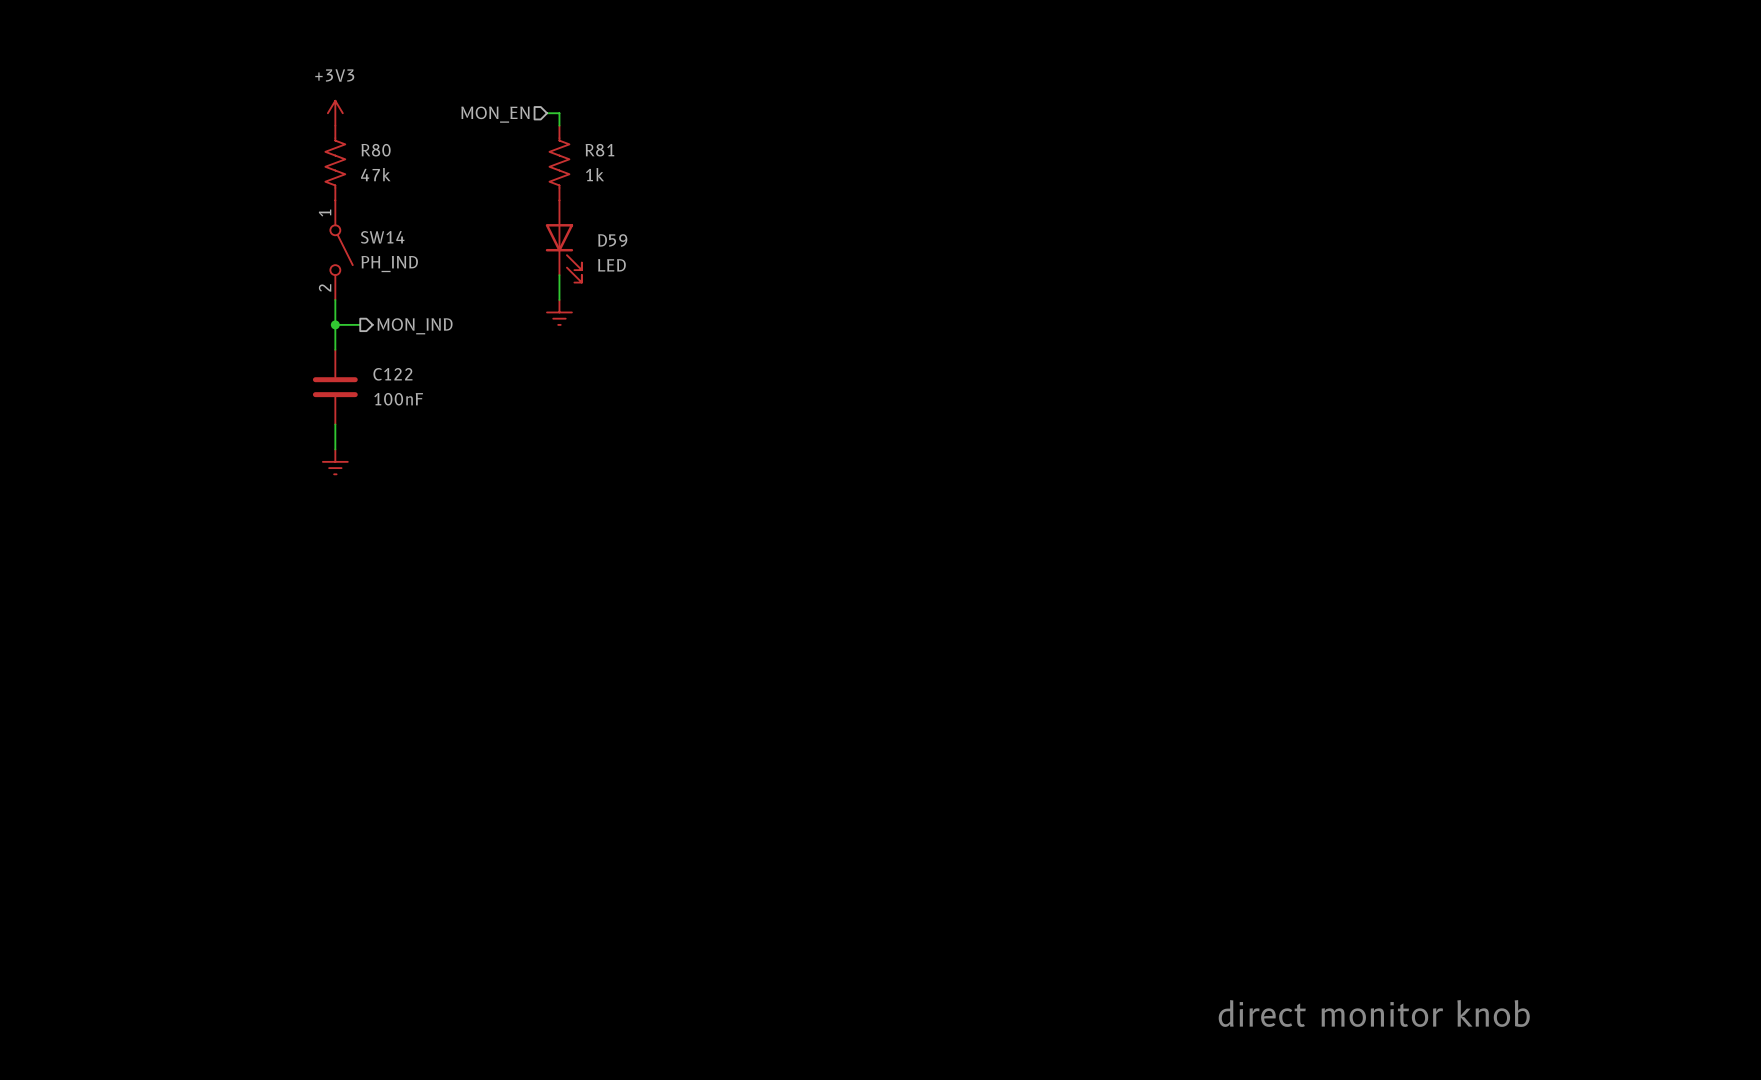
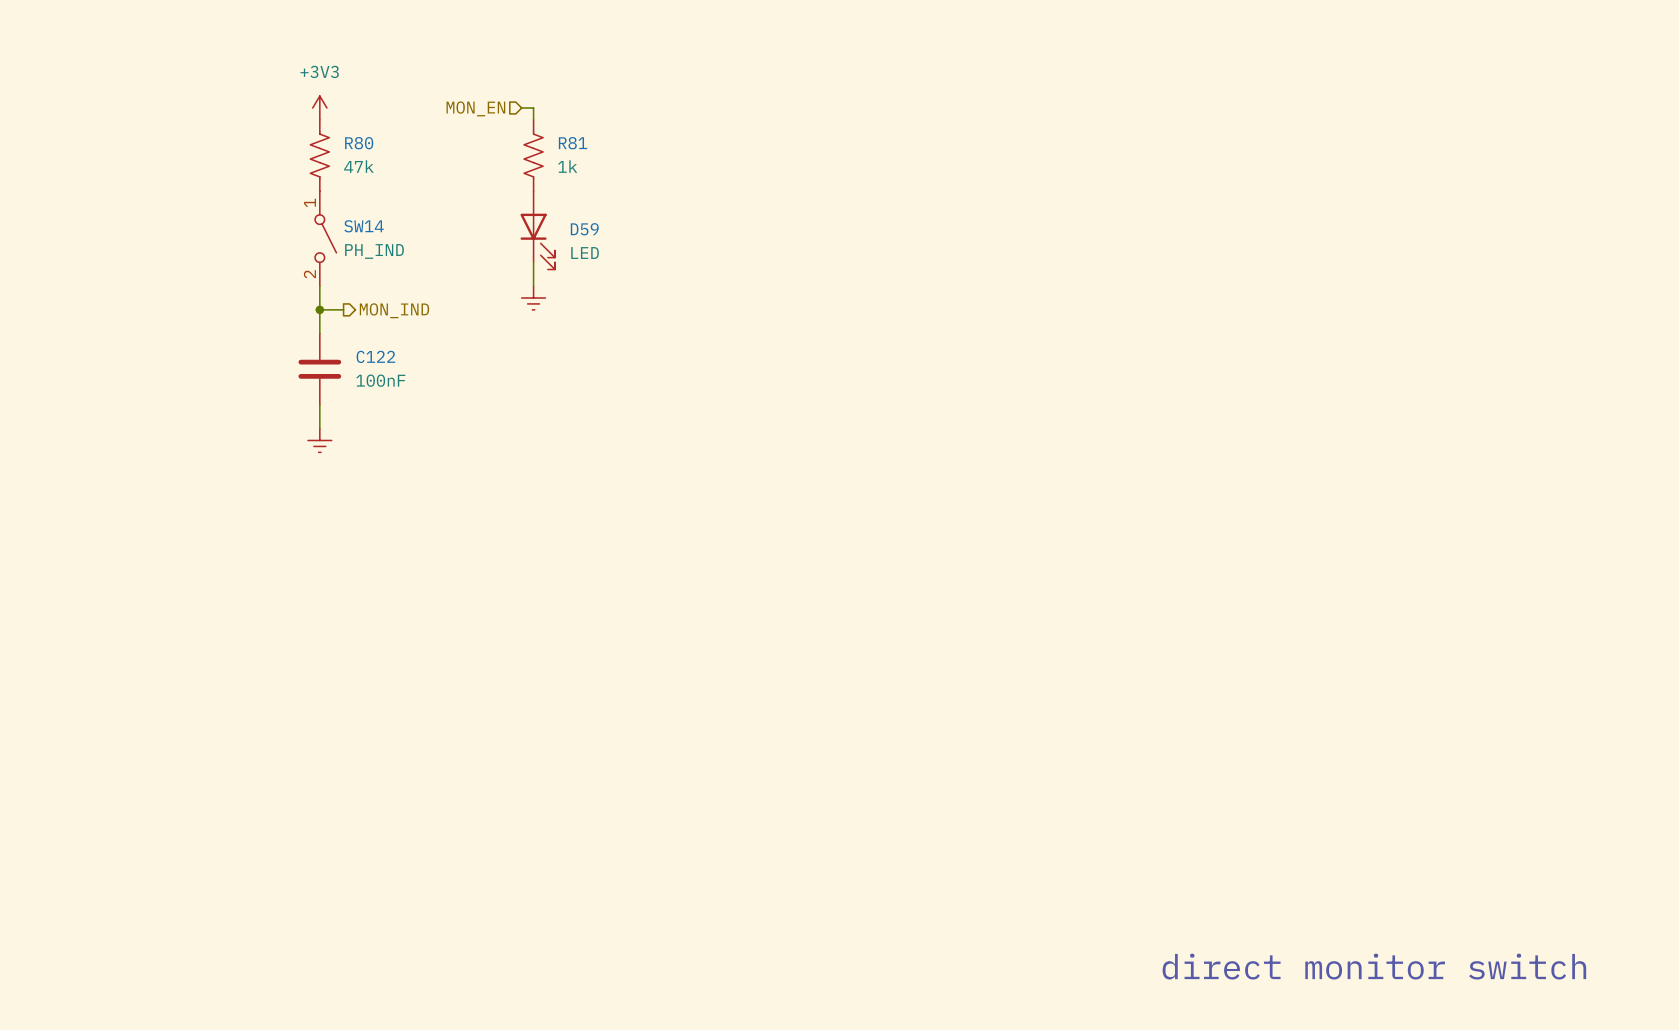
text: direct monitor knob (1374, 1013) -> direct monitor switch (1374, 966)

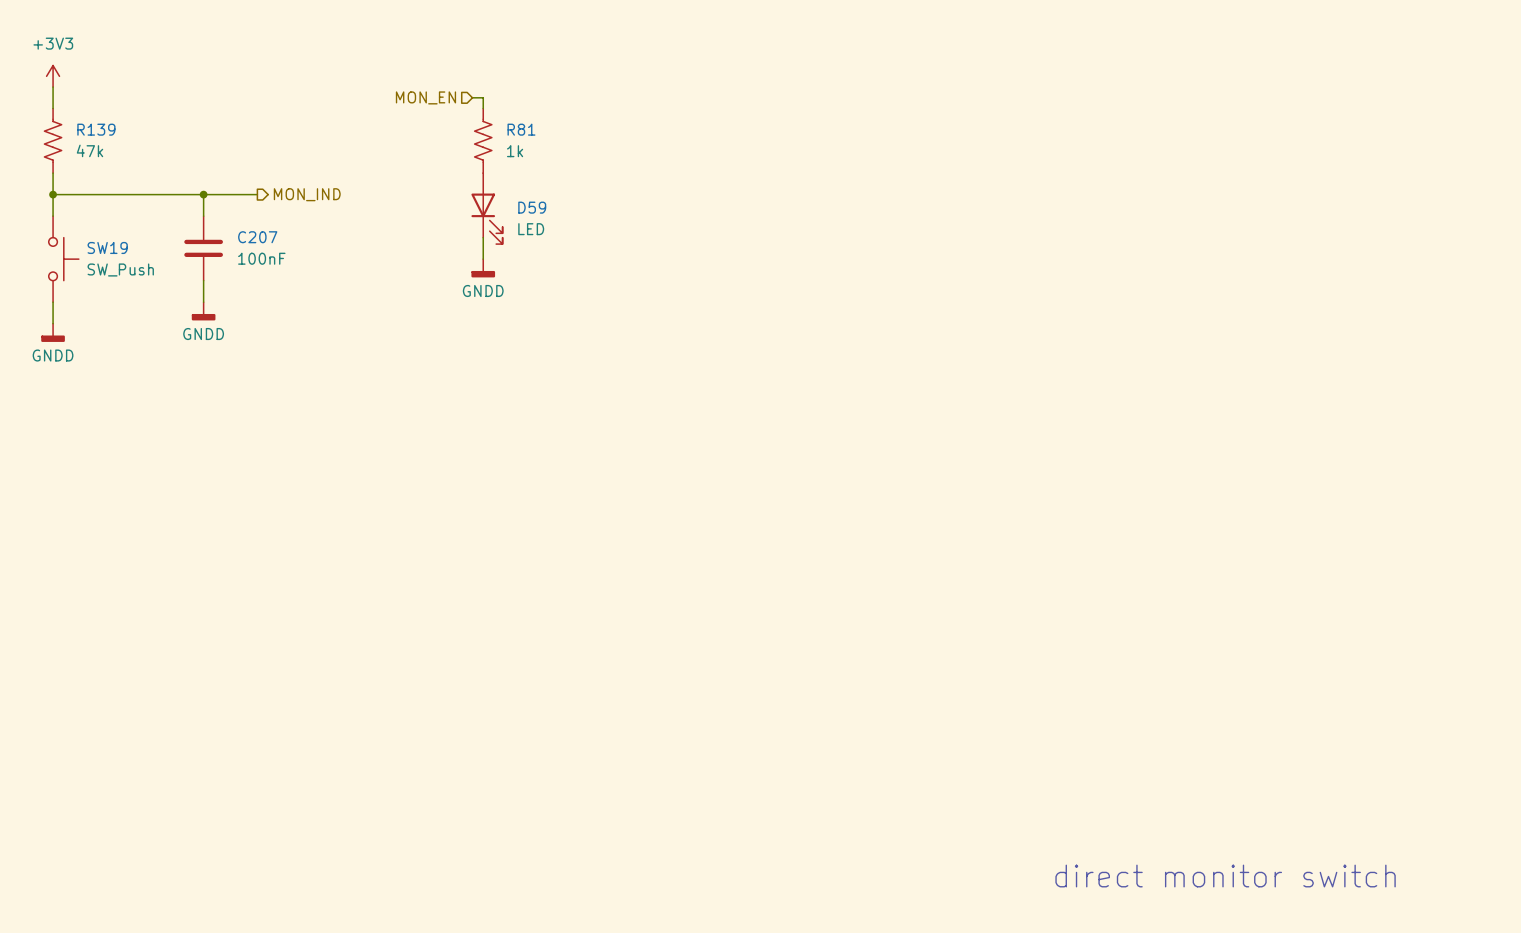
power symbol: none -> +3V3 (53, 76)
wire: none -> (53, 87) (53, 108)
power symbol: +3V3 (319, 108) -> none
R139: none -> 47k (53, 140)
R80: 47k (319, 155) -> none
wire: none -> (53, 173) (53, 216)
wire: none -> (53, 194) (257, 194)
junction: none -> (53, 194)
wire: none -> (203, 194) (203, 216)
junction: none -> (203, 194)
SW14: PH_IND (325, 238) -> none
C207: none -> 100nF (203, 248)
SW19: none -> SW_Push (63, 259)
wire: (319, 286) (319, 333) -> none
power symbol shape: [521, 286, 546, 310] -> [471, 259, 496, 278]
wire: (319, 309) (343, 309) -> none
junction: (319, 309) -> none
hierarchical label position: MON_IND (394, 310) -> MON_IND (307, 194)
power symbol text: none -> GNDD (483, 290)
wire: none -> (53, 302) (53, 323)
power symbol: none -> GNDD (203, 311)
power symbol: none -> GNDD (53, 332)
C122: 100nF (319, 369) -> none
wire: (319, 404) (319, 428) -> (203, 280) (203, 302)
power symbol: (319, 440) -> none

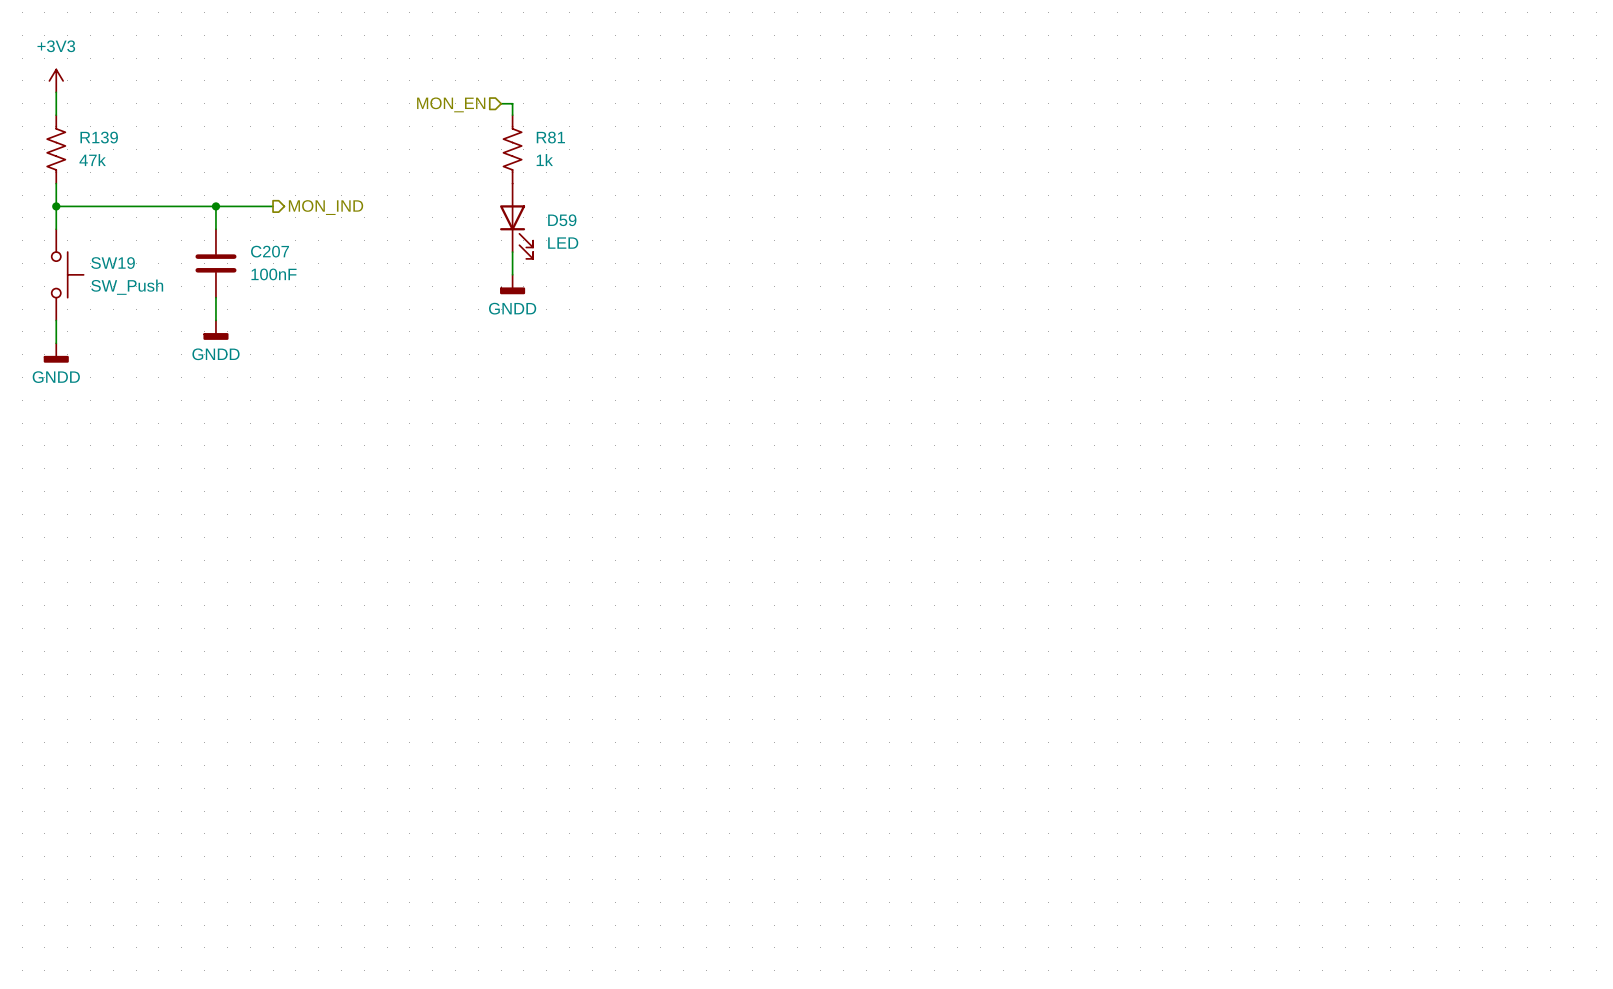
text: direct monitor switch (1225, 876) -> none

